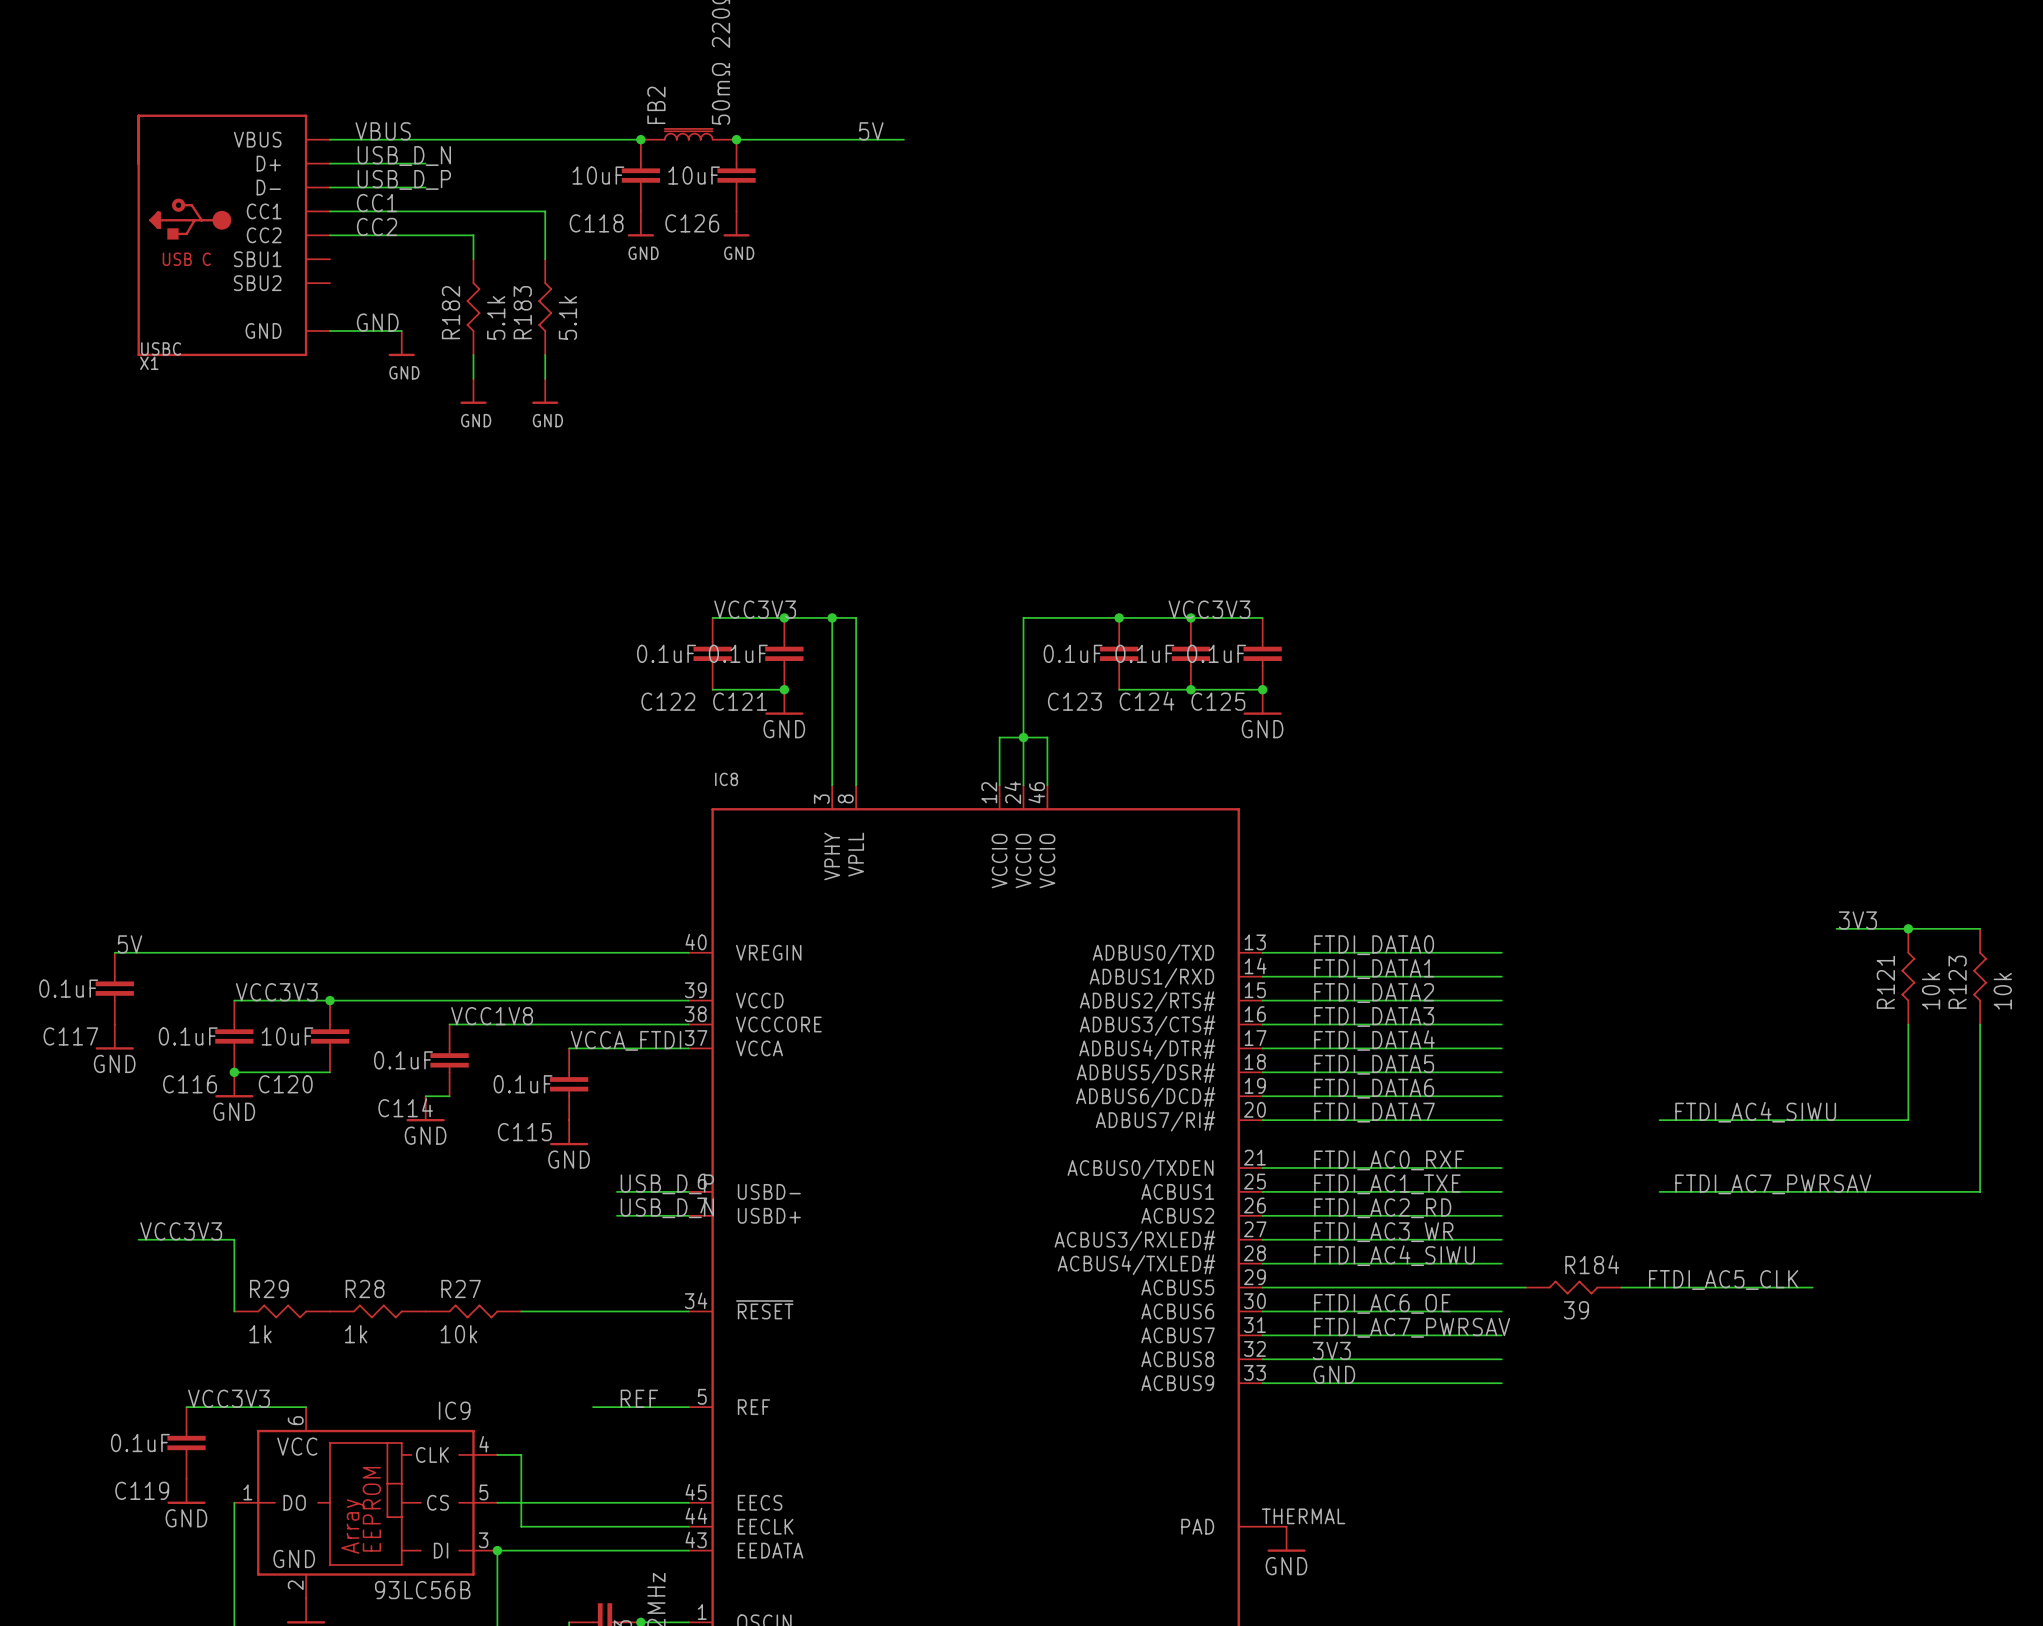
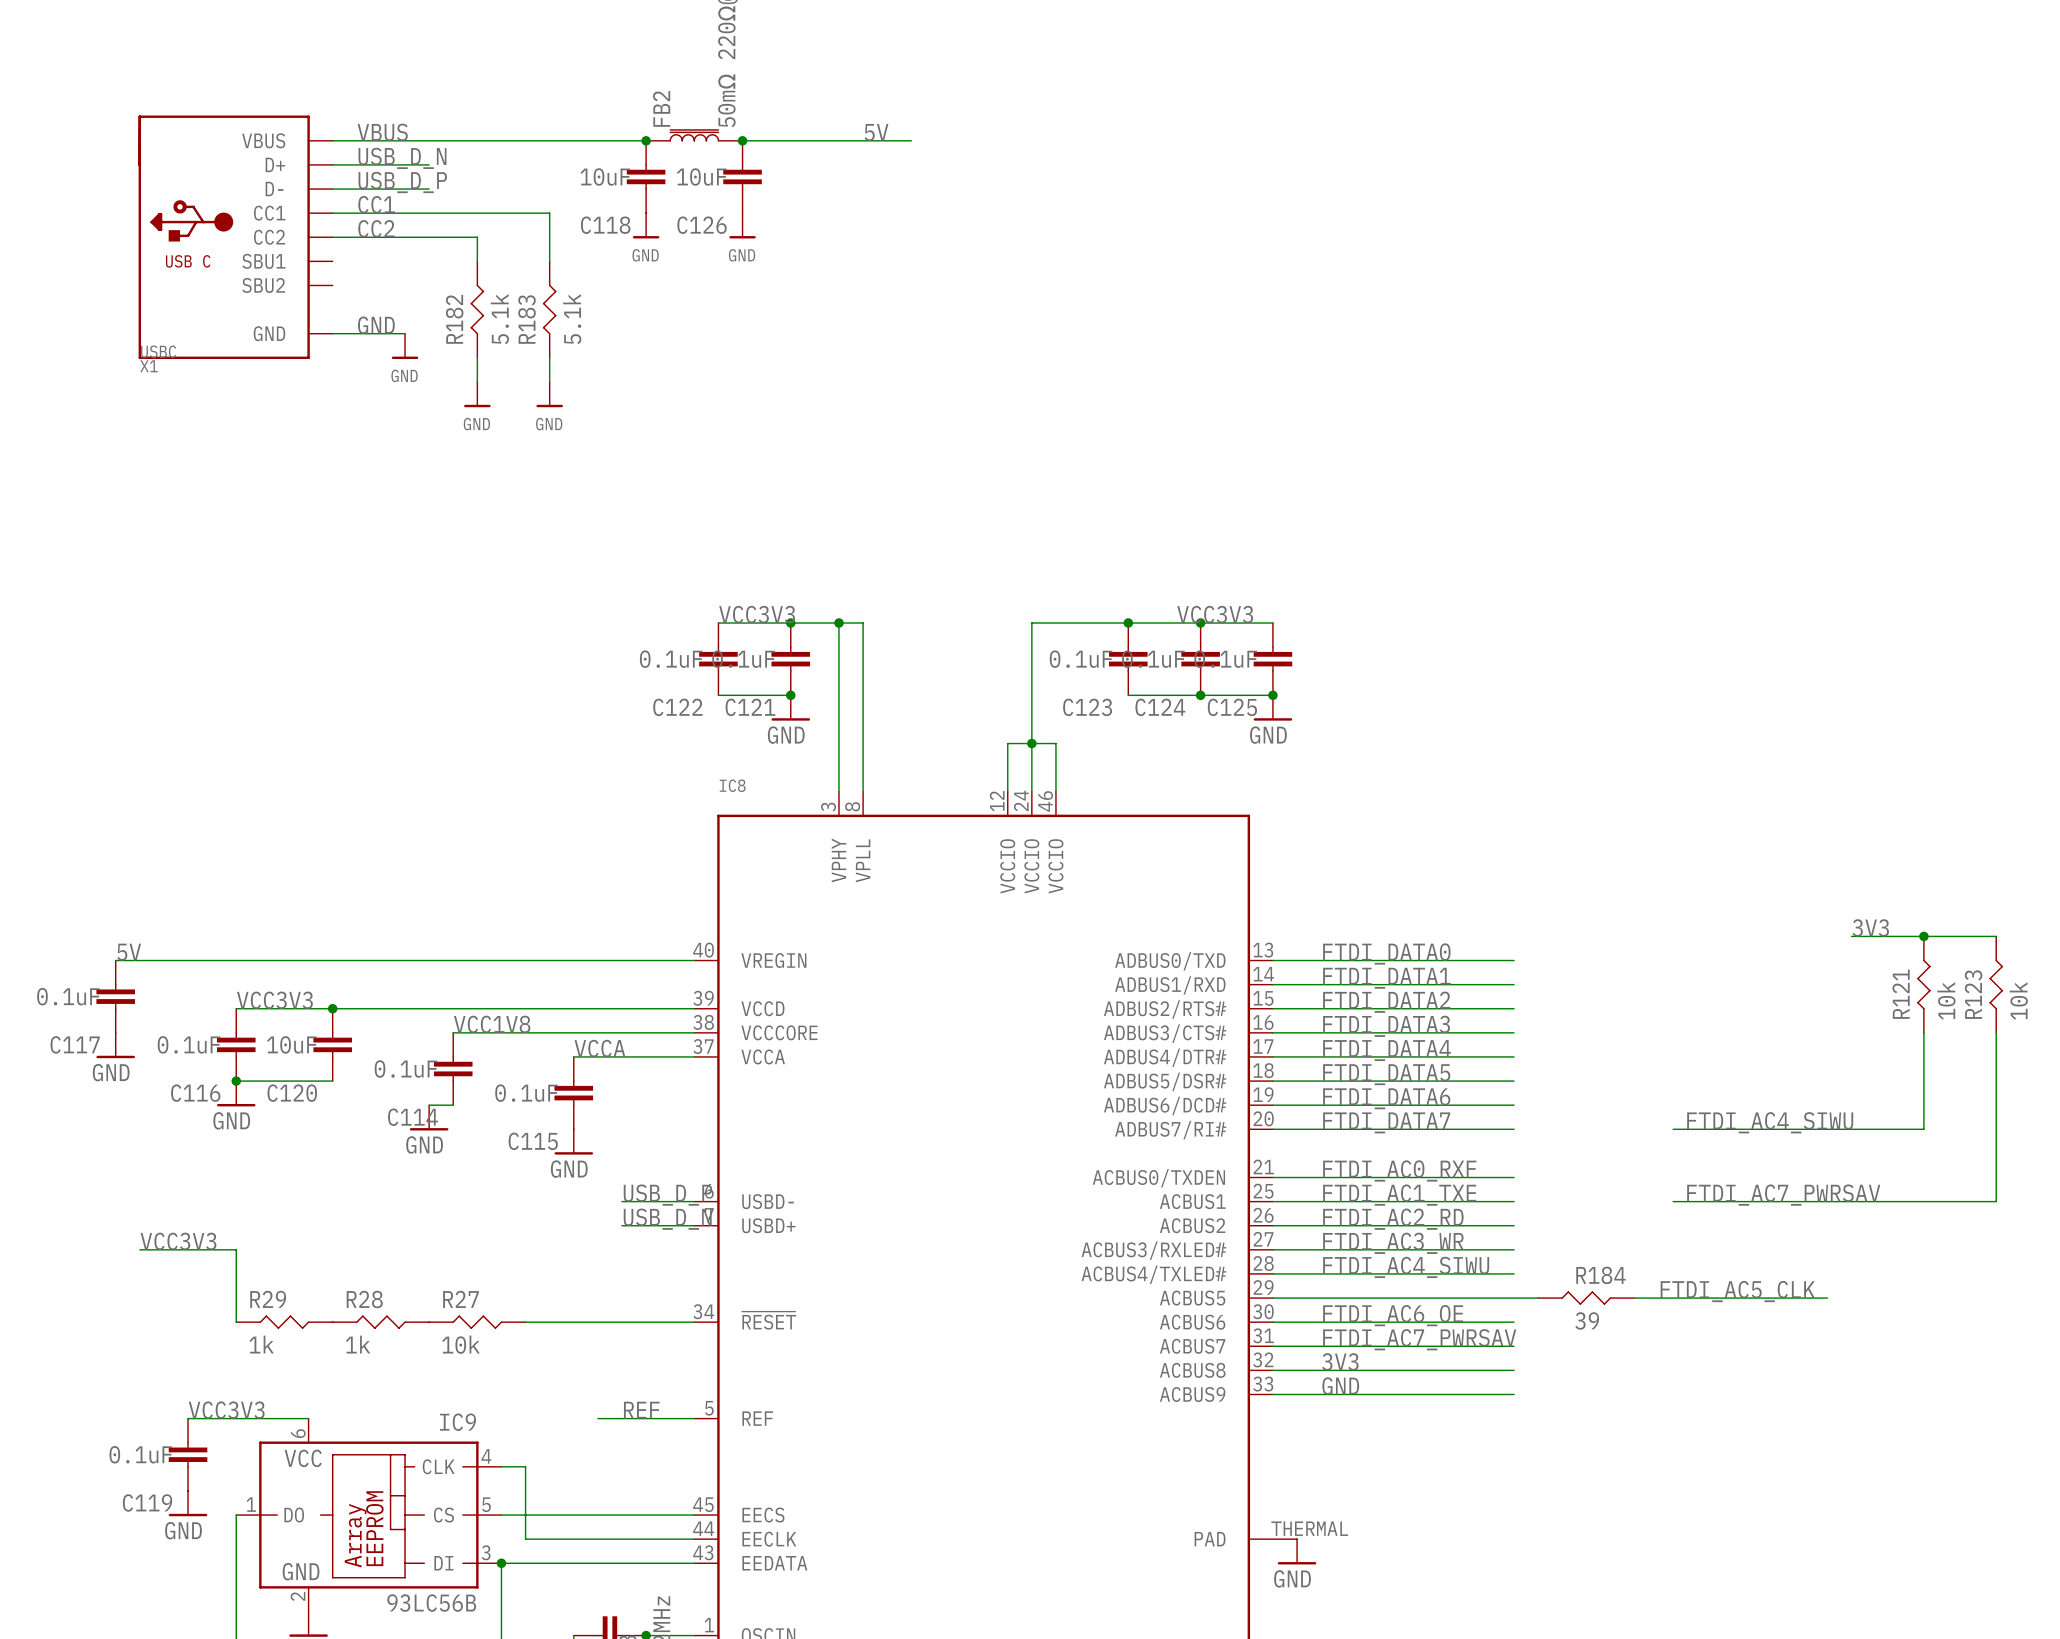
label: VCCA_FTDI (625, 1040) -> VCCA (599, 1048)

